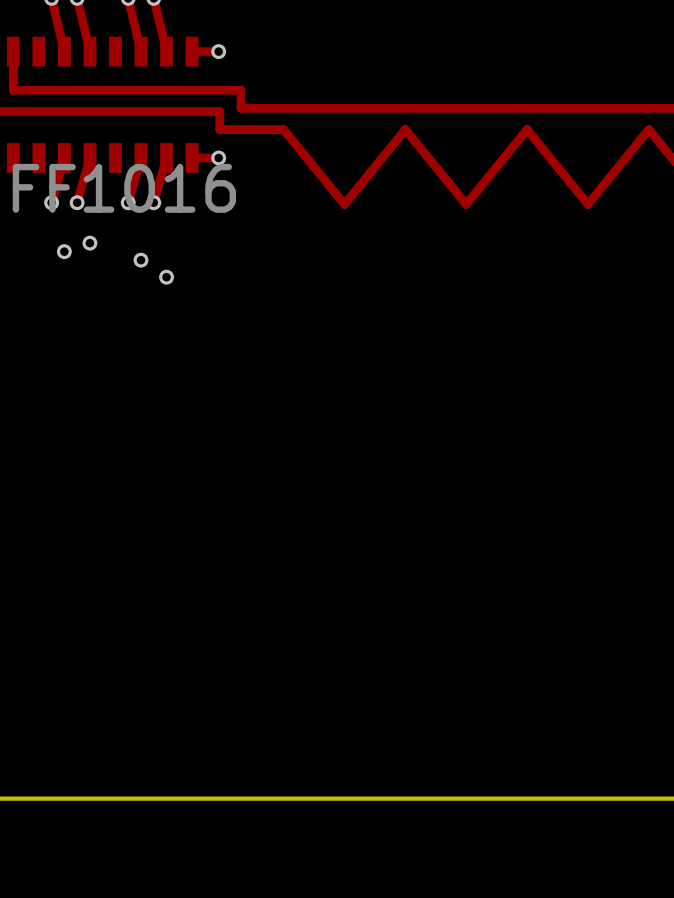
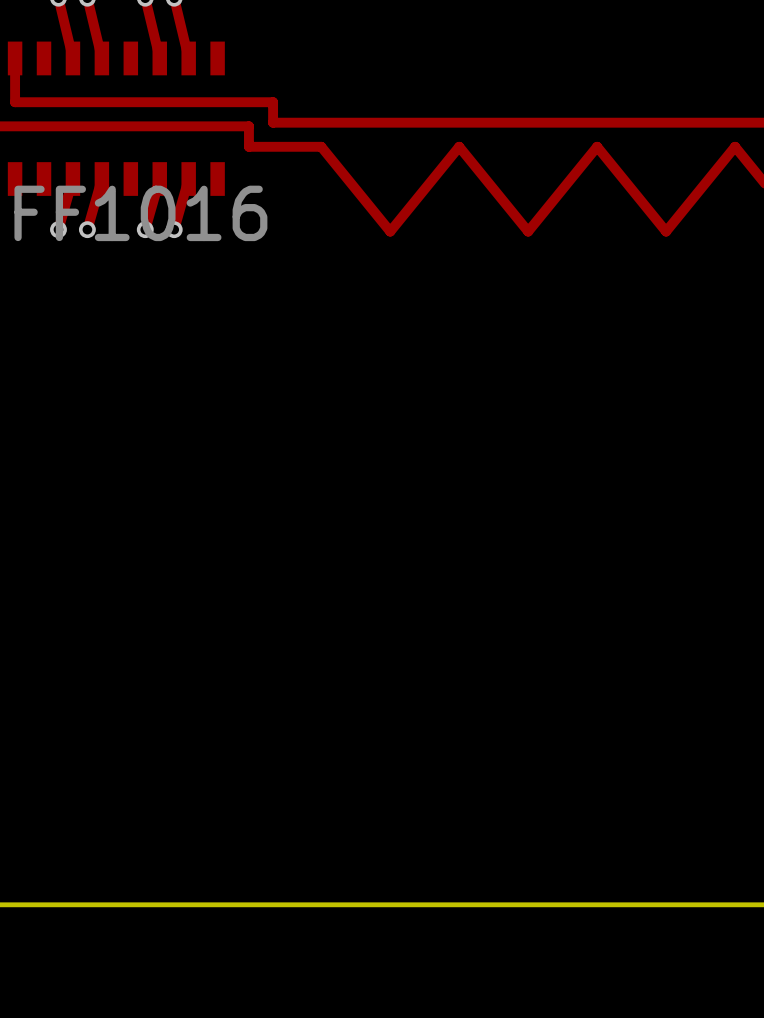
top track: (192, 51) (218, 51) -> none
via: (218, 51) -> none
top track: (192, 158) (218, 158) -> none
via: (218, 158) -> none
via: (89, 243) -> none
via: (64, 251) -> none
via: (141, 260) -> none
via: (166, 277) -> none

